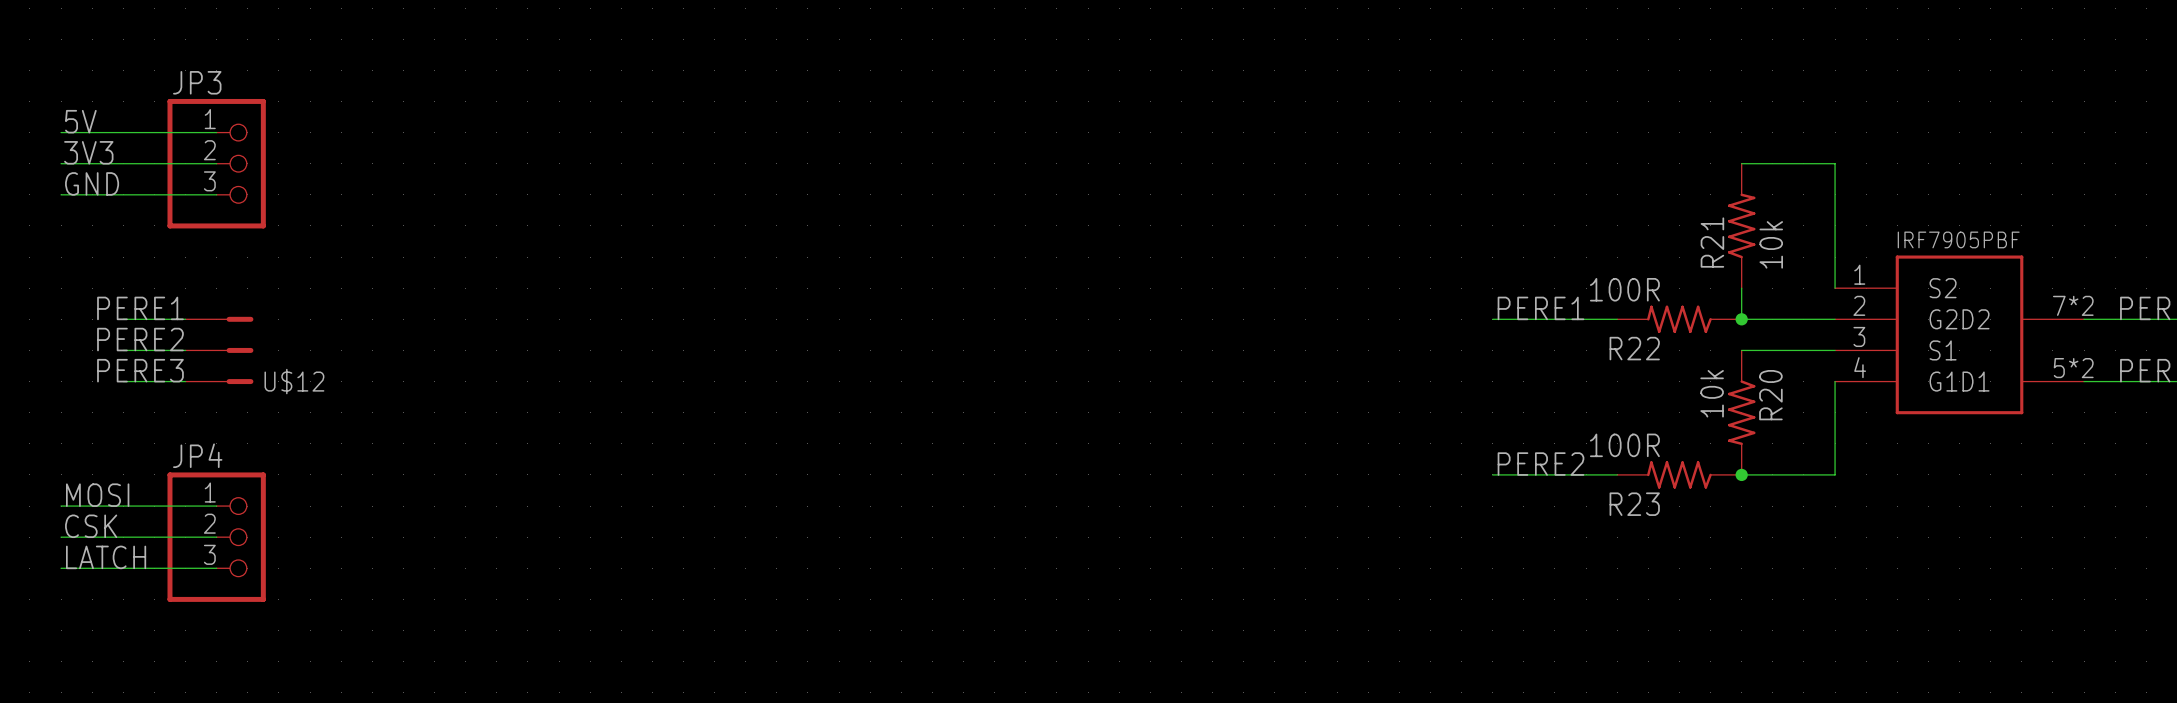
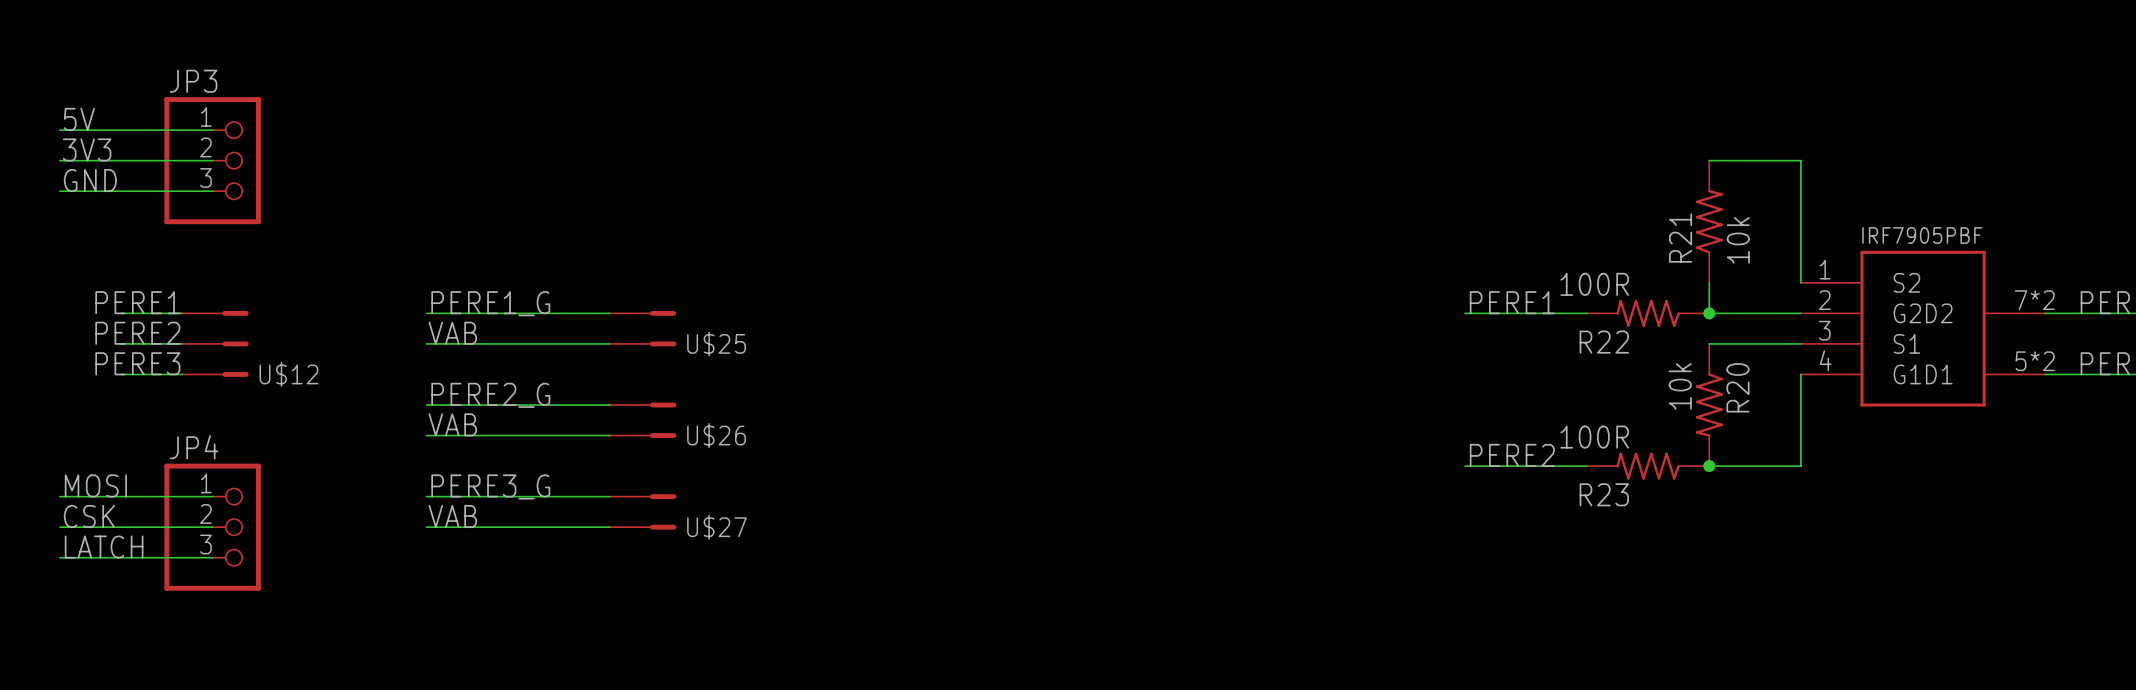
label: none -> PERE1_G (490, 303)
wire: none -> (426, 313) (609, 313)
U$25: none -> (642, 328)
label: none -> VAB (452, 333)
wire: none -> (426, 343) (609, 343)
label: none -> PERE2_G (490, 395)
wire: none -> (426, 405) (609, 405)
U$26: none -> (642, 420)
label: none -> VAB (452, 424)
wire: none -> (426, 435) (609, 435)
label: none -> PERE3_G (490, 486)
wire: none -> (426, 496) (609, 496)
U$27: none -> (642, 511)
label: none -> VAB (452, 516)
wire: none -> (426, 527) (609, 527)

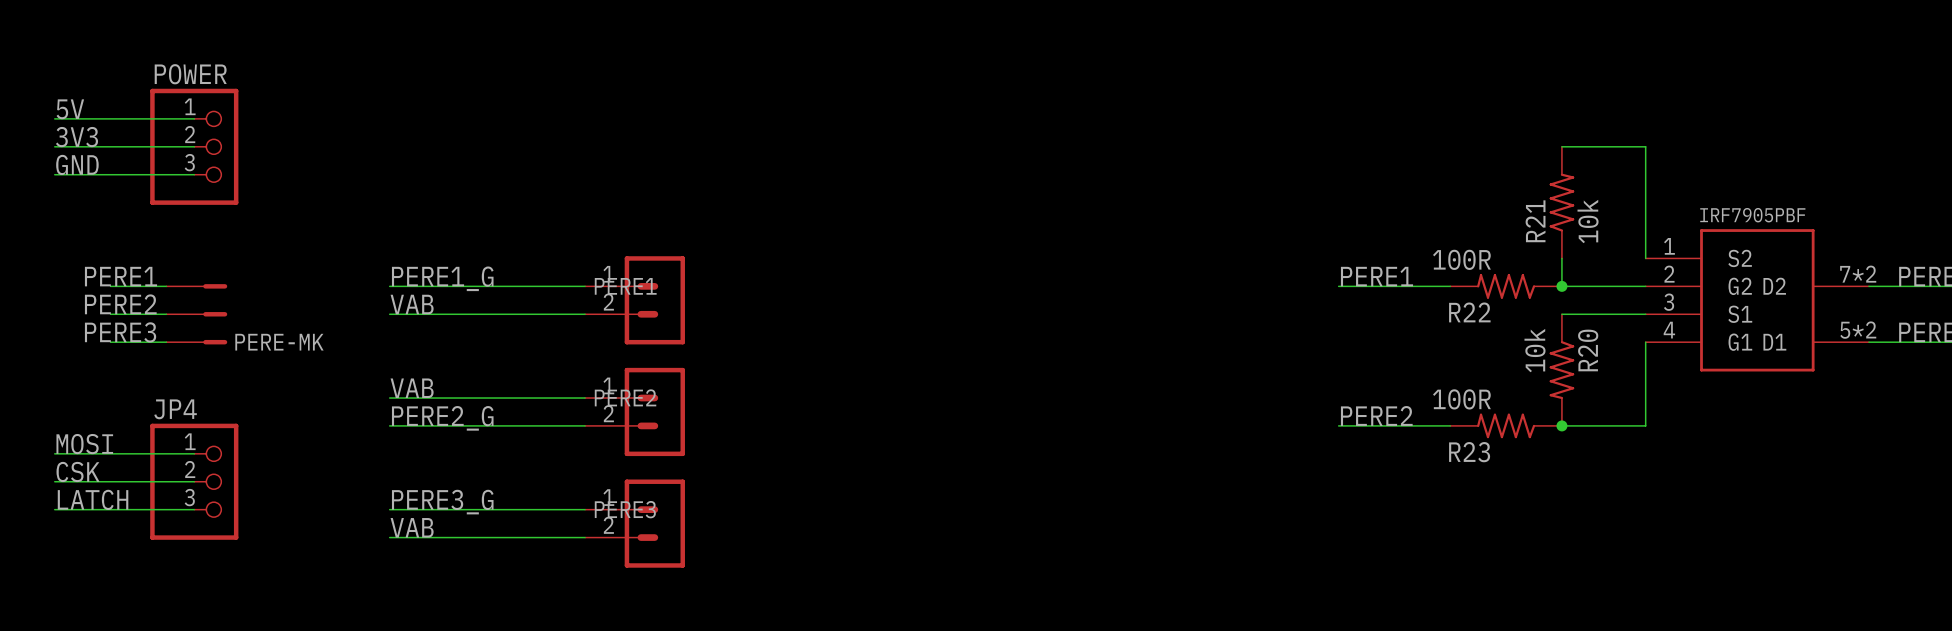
JP3 name: JP3 (193, 81) -> POWER (190, 74)
U$25: (642, 328) -> none
PERE1: none -> (635, 300)
U$12 name: U$12 (288, 374) -> PERE-MK (279, 342)
label position: PERE2_G (490, 395) -> PERE2_G (442, 418)
wire: (426, 405) (609, 405) -> none
U$26: (642, 420) -> none
PERE2: none -> (635, 411)
wire: none -> (389, 425) (585, 425)
label position: PERE3_G (490, 486) -> PERE3_G (442, 502)
wire: (426, 496) (609, 496) -> none
U$27: (642, 511) -> none
label position: VAB (452, 516) -> VAB (412, 527)
wire: (426, 527) (609, 527) -> none
wire: none -> (389, 509) (585, 509)
PERE3: none -> (635, 523)
wire: none -> (389, 537) (585, 537)

